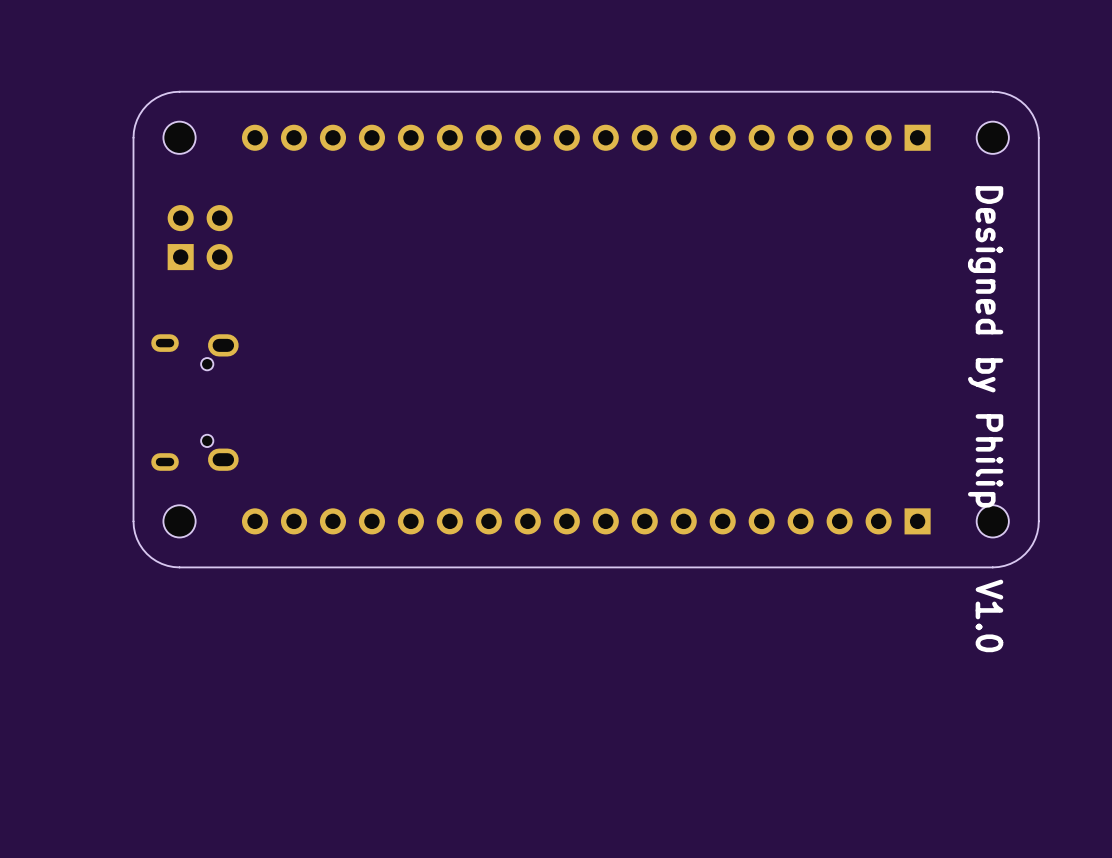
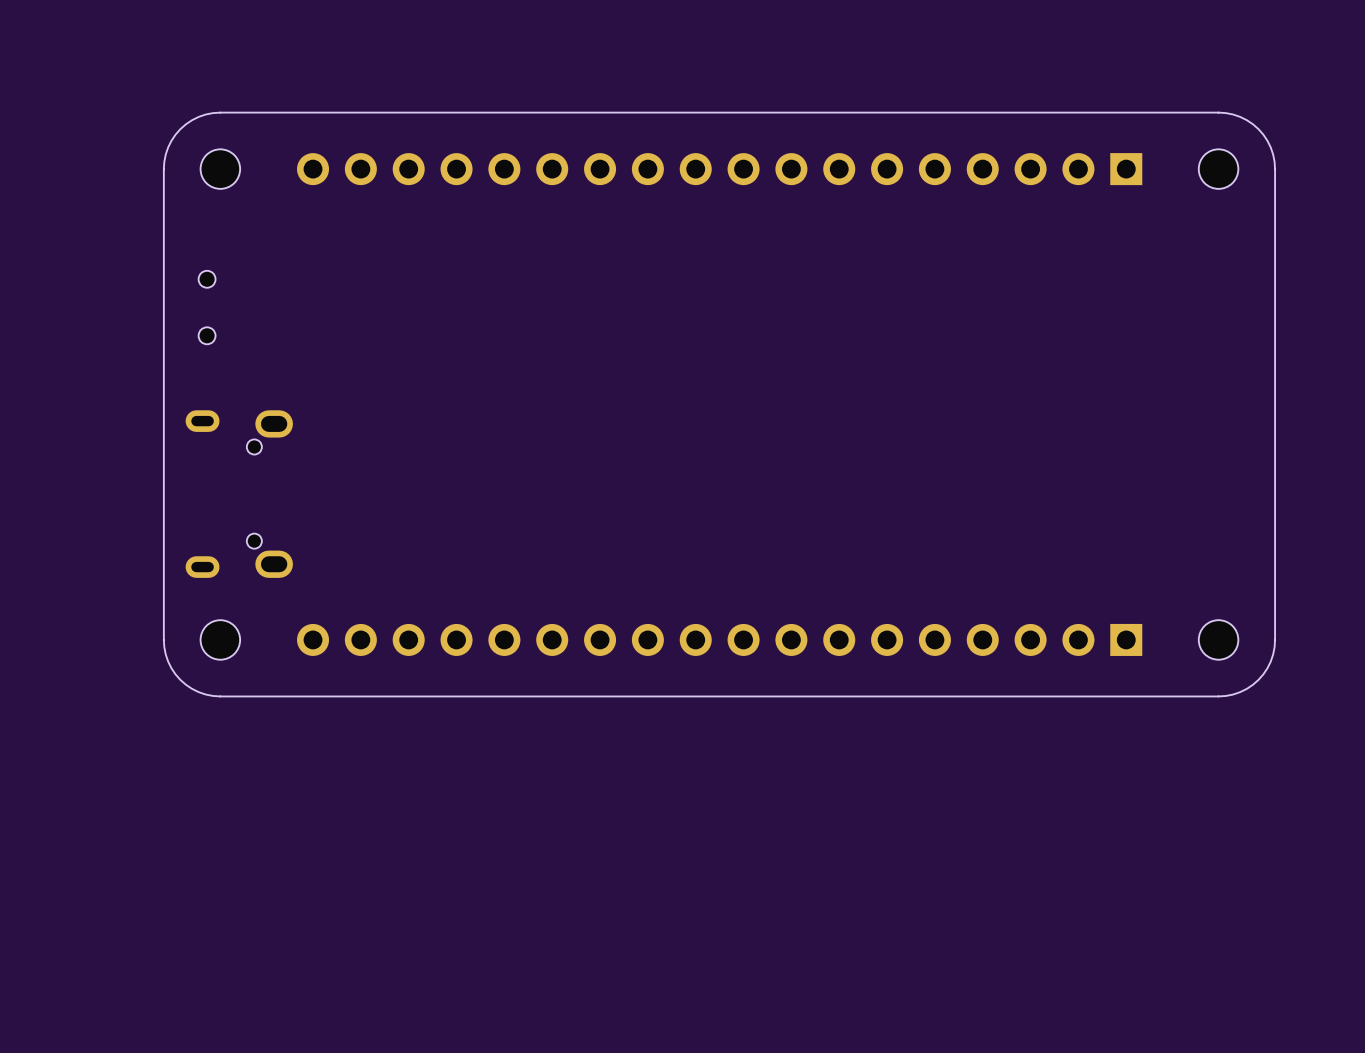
part: (200, 237) -> none
part: none -> (207, 307)
text: Designed by Philip V1.0 (985, 419) -> none

